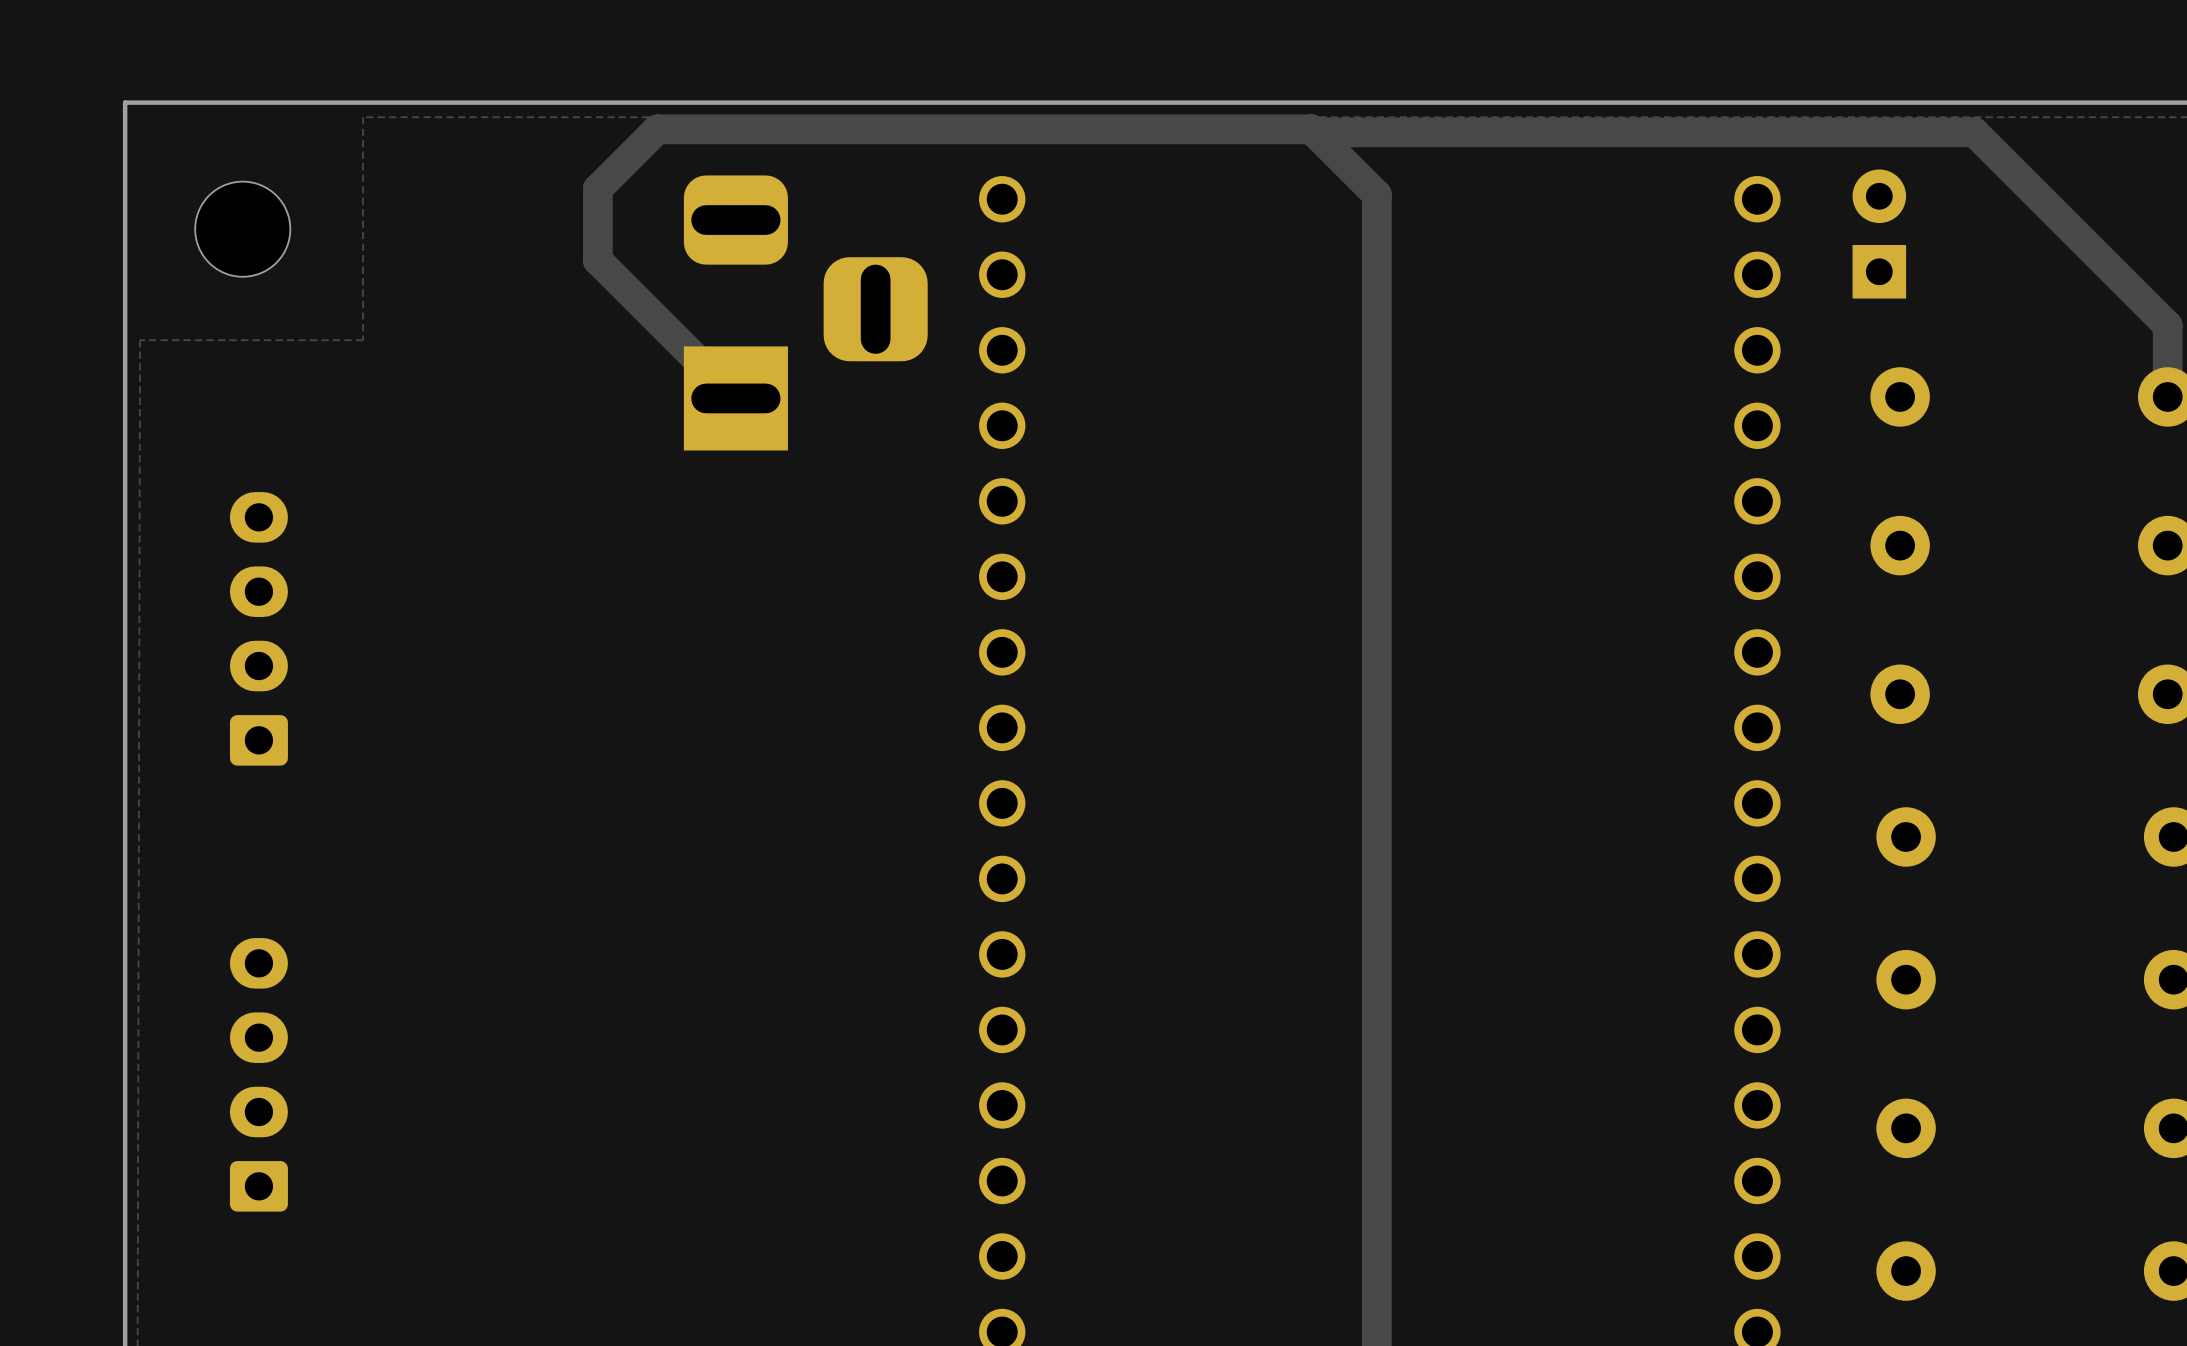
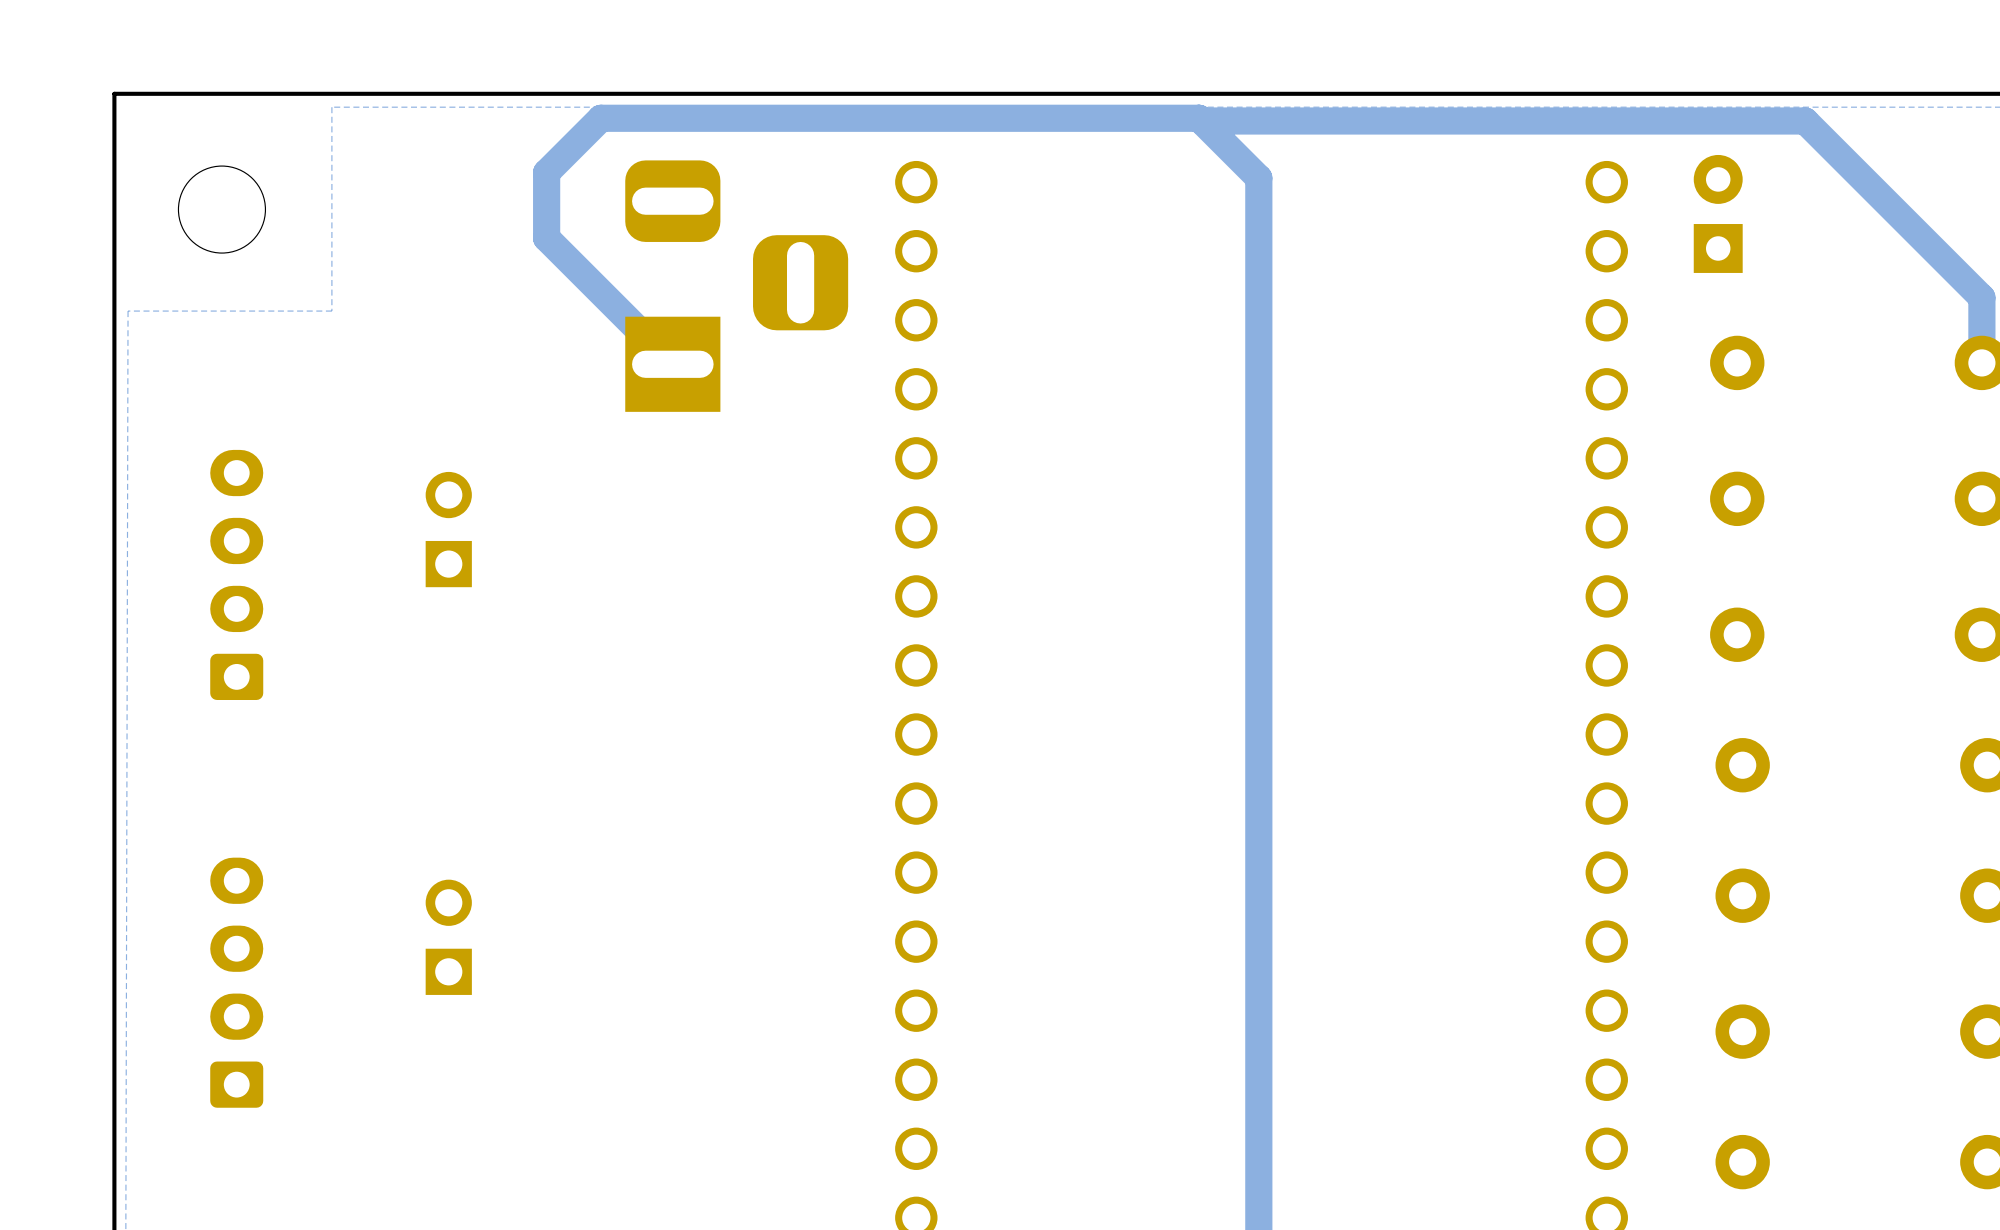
part: none -> (448, 529)
part: none -> (448, 937)

